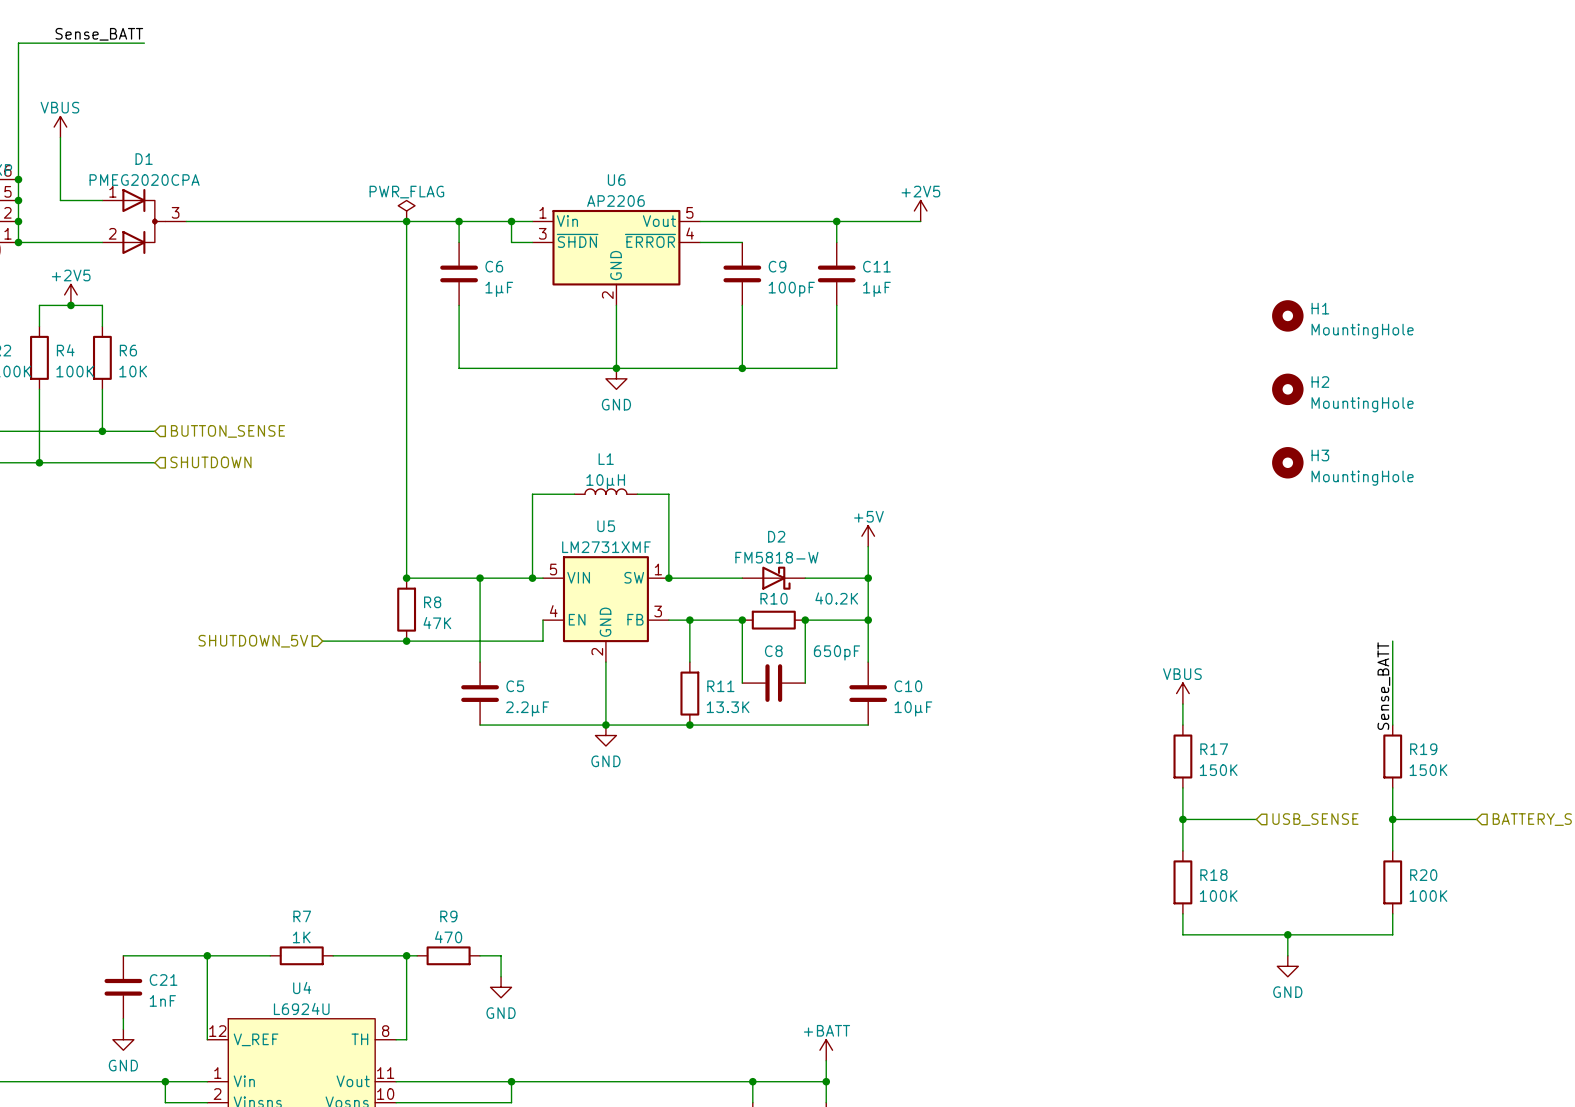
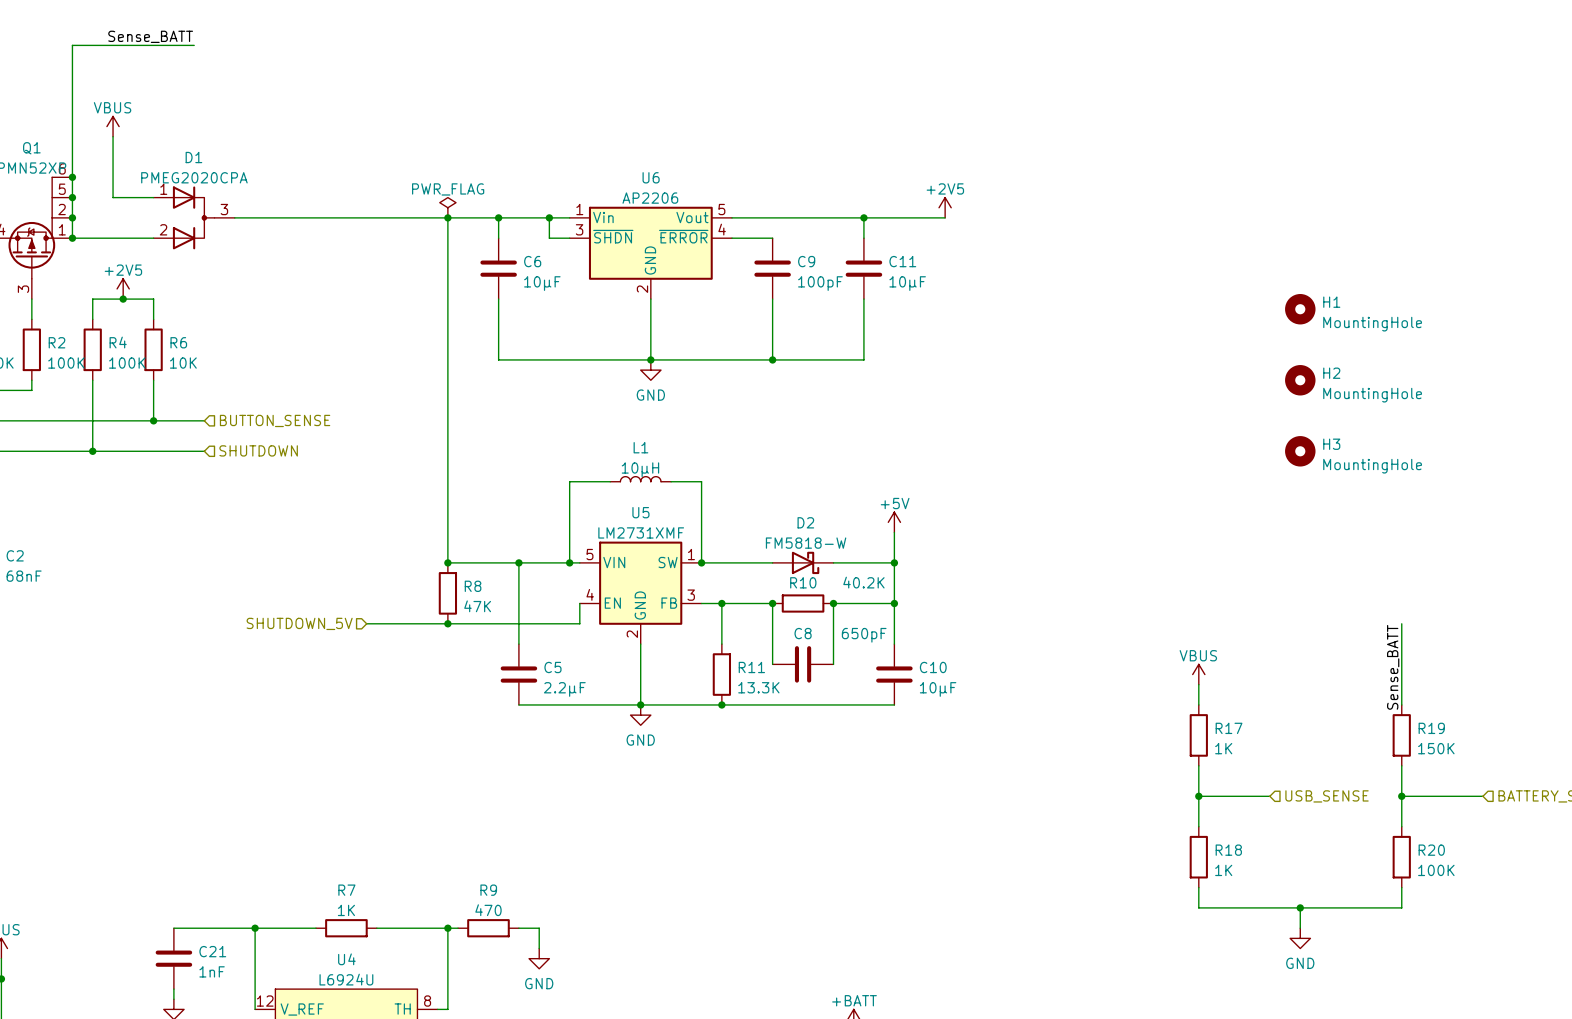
C6 value: 1µF (499, 289) -> 10µF (542, 283)
C11 value: 1µF (876, 289) -> 10µF (907, 283)
R17 value: 150K (1218, 770) -> 1K (1223, 748)
R18 value: 100K (1218, 896) -> 1K (1223, 870)

